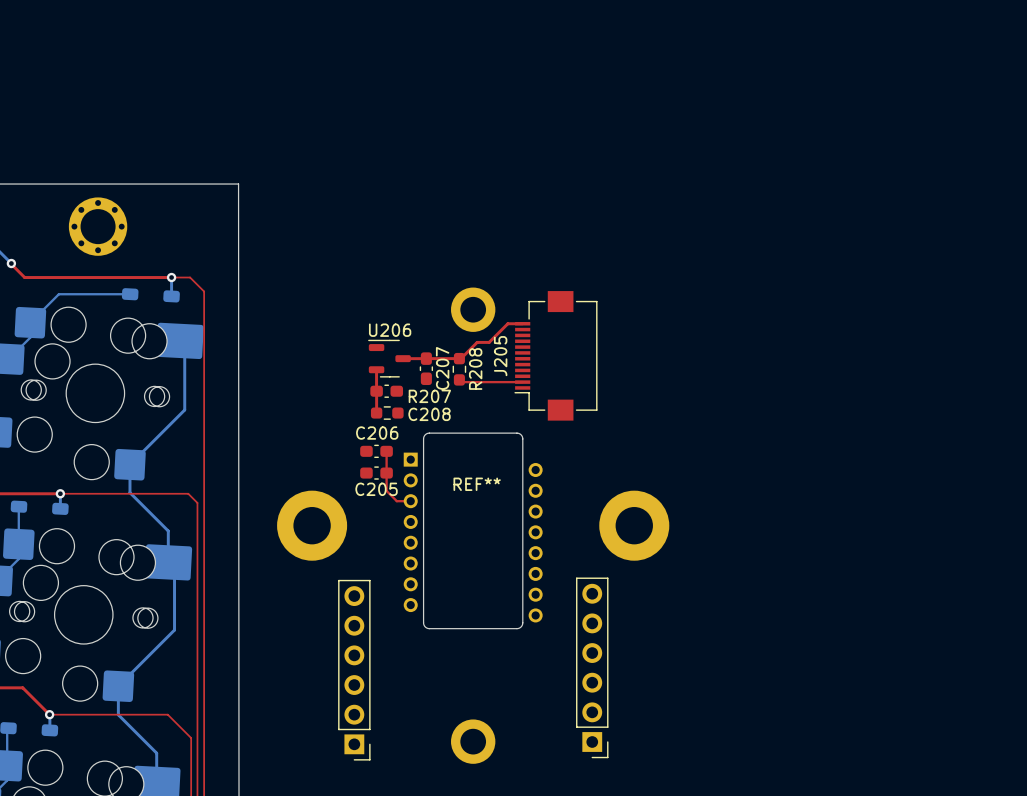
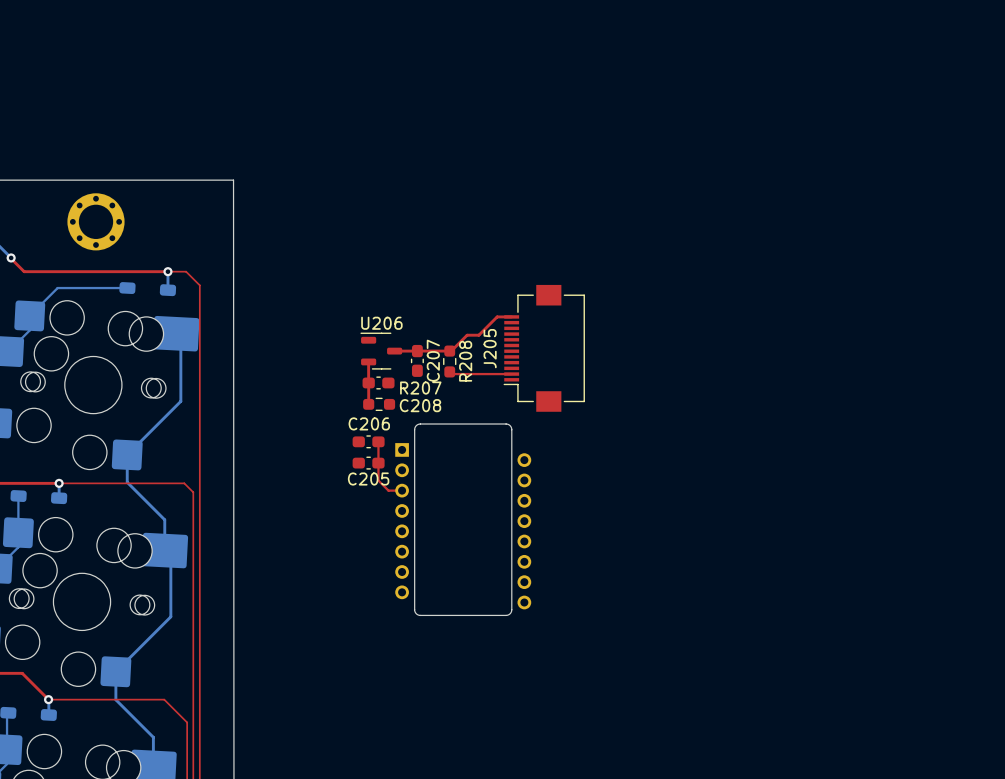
part: (312, 525) -> none
REF**: (473, 525) -> none
part: (634, 525) -> none
part: (592, 667) -> none
part: (354, 670) -> none

